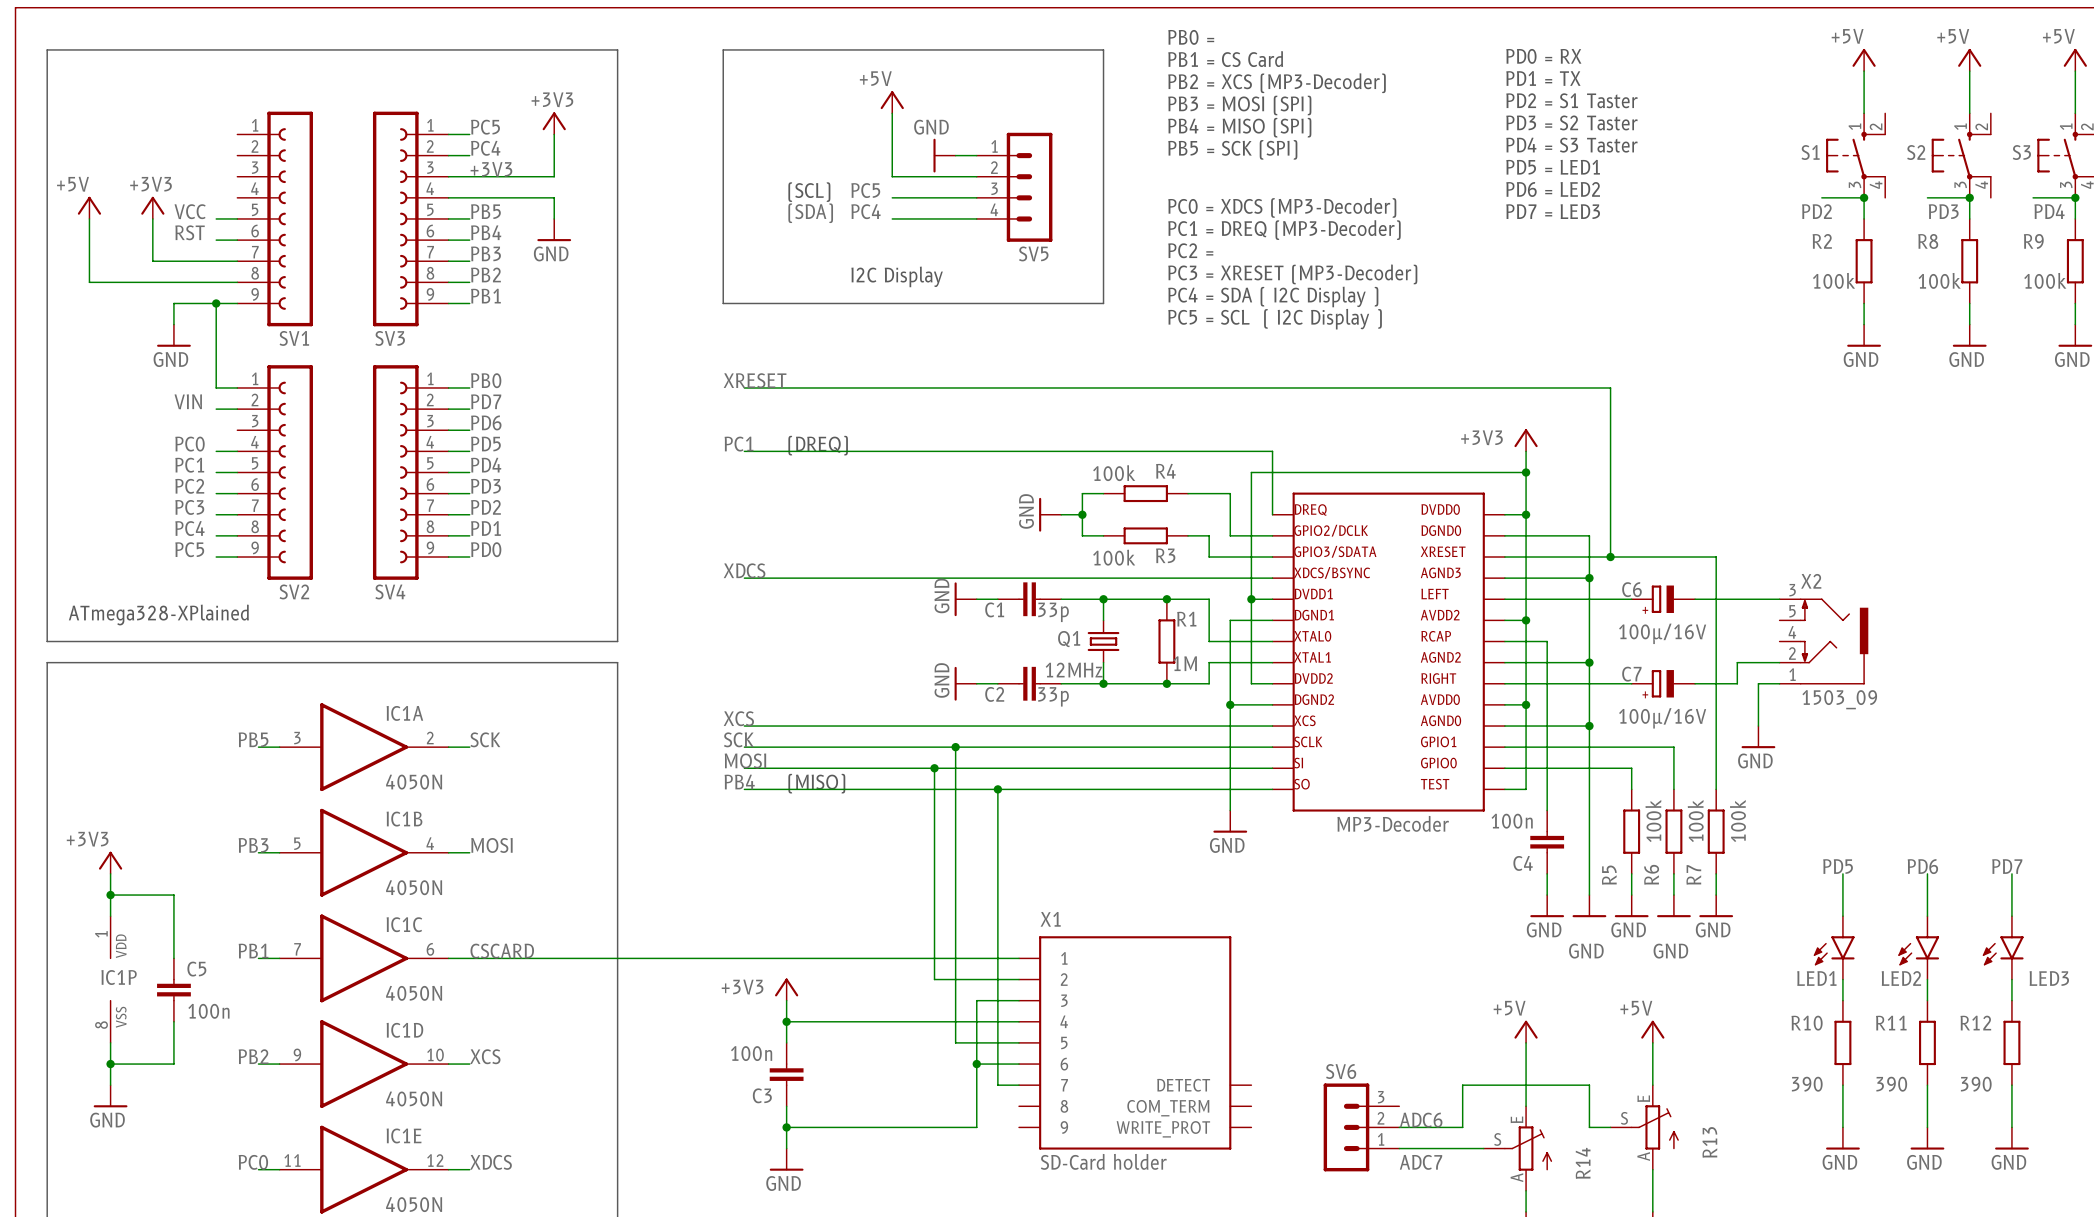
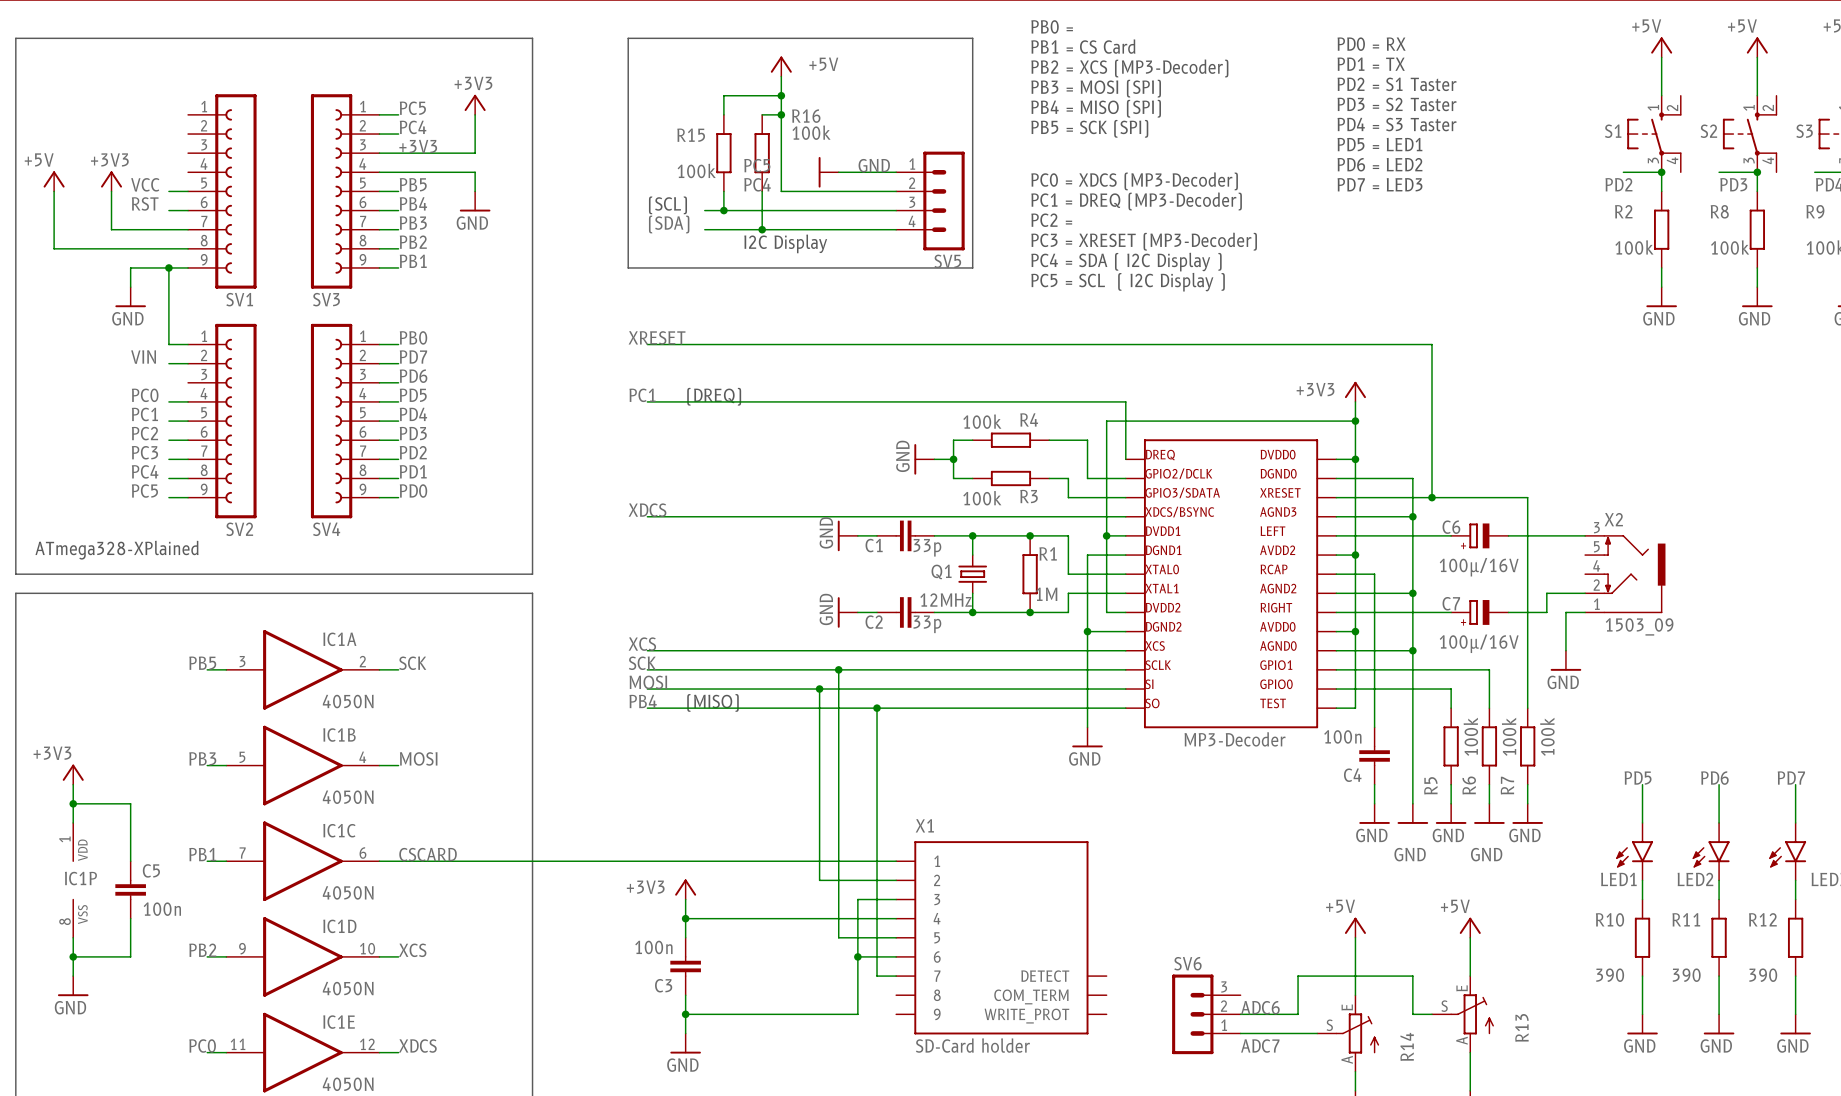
power symbol text position: +5V (875, 78) -> +5V (823, 64)
wire: none -> (781, 76) (781, 95) (723, 95) (723, 114)
power symbol position: +5V (892, 102) -> +5V (781, 66)
junction: none -> (781, 95)
power symbol text position: GND (931, 127) -> GND (874, 165)
junction: none -> (781, 114)
power symbol position: GND (944, 155) -> GND (828, 172)
wire: (955, 155) (976, 155) -> (762, 114) (781, 114)
R15: none -> 100k (723, 153)
R16: none -> 100k (762, 153)
wire: (892, 176) (976, 176) -> (781, 153) (781, 191)
SV5 position: (1014, 187) -> (930, 201)
text position: (SCL) (809, 192) -> (SCL) (667, 205)
wire: (892, 197) (955, 197) -> none
text position: (SDA) (810, 213) -> (SDA) (669, 224)
wire: none -> (723, 191) (723, 210)
wire: none -> (762, 191) (762, 229)
wire: none -> (704, 210) (896, 210)
junction: none -> (723, 210)
wire: none -> (704, 229) (896, 229)
junction: none -> (762, 229)

